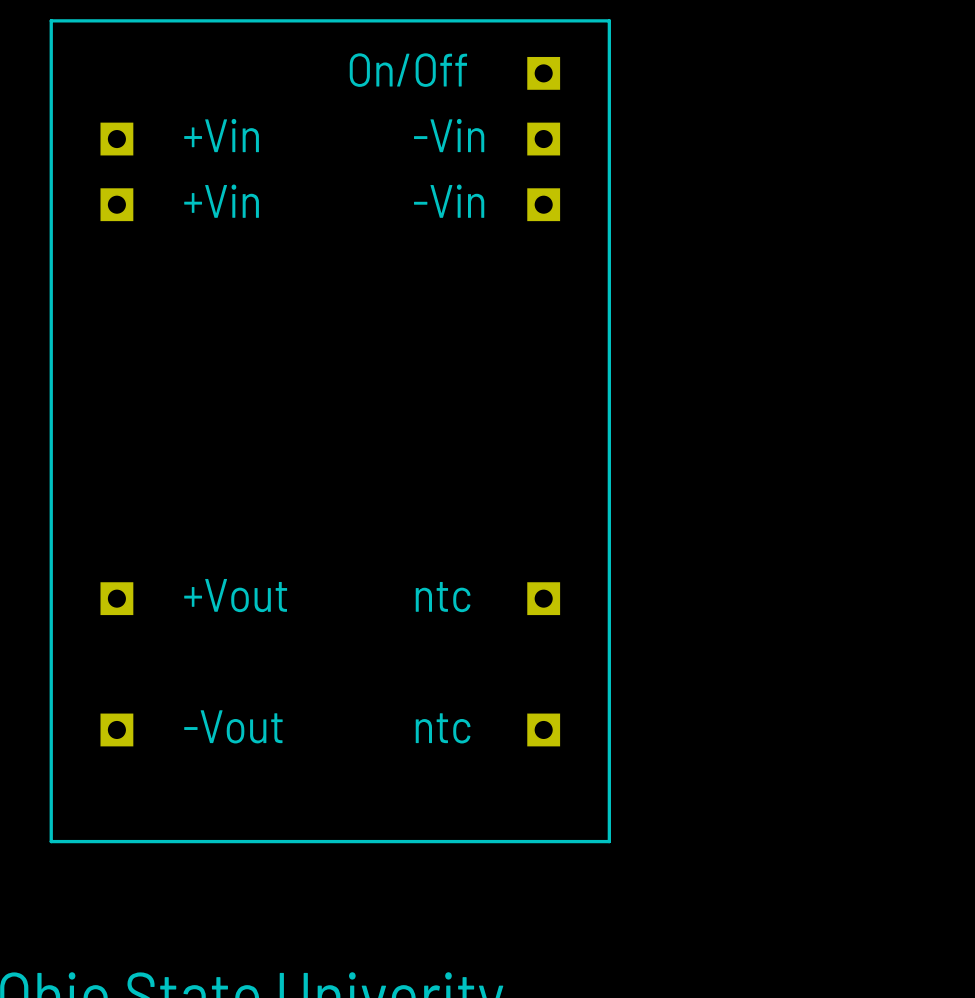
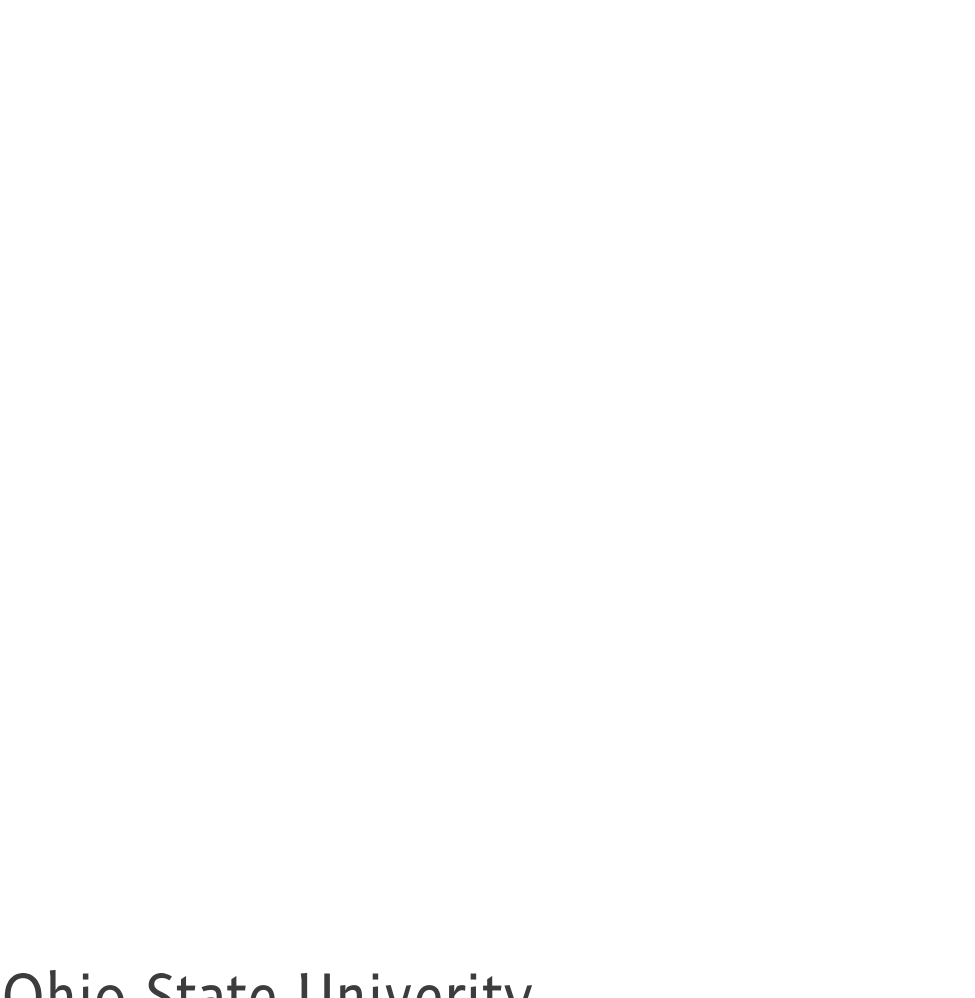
part: (330, 431) -> none

